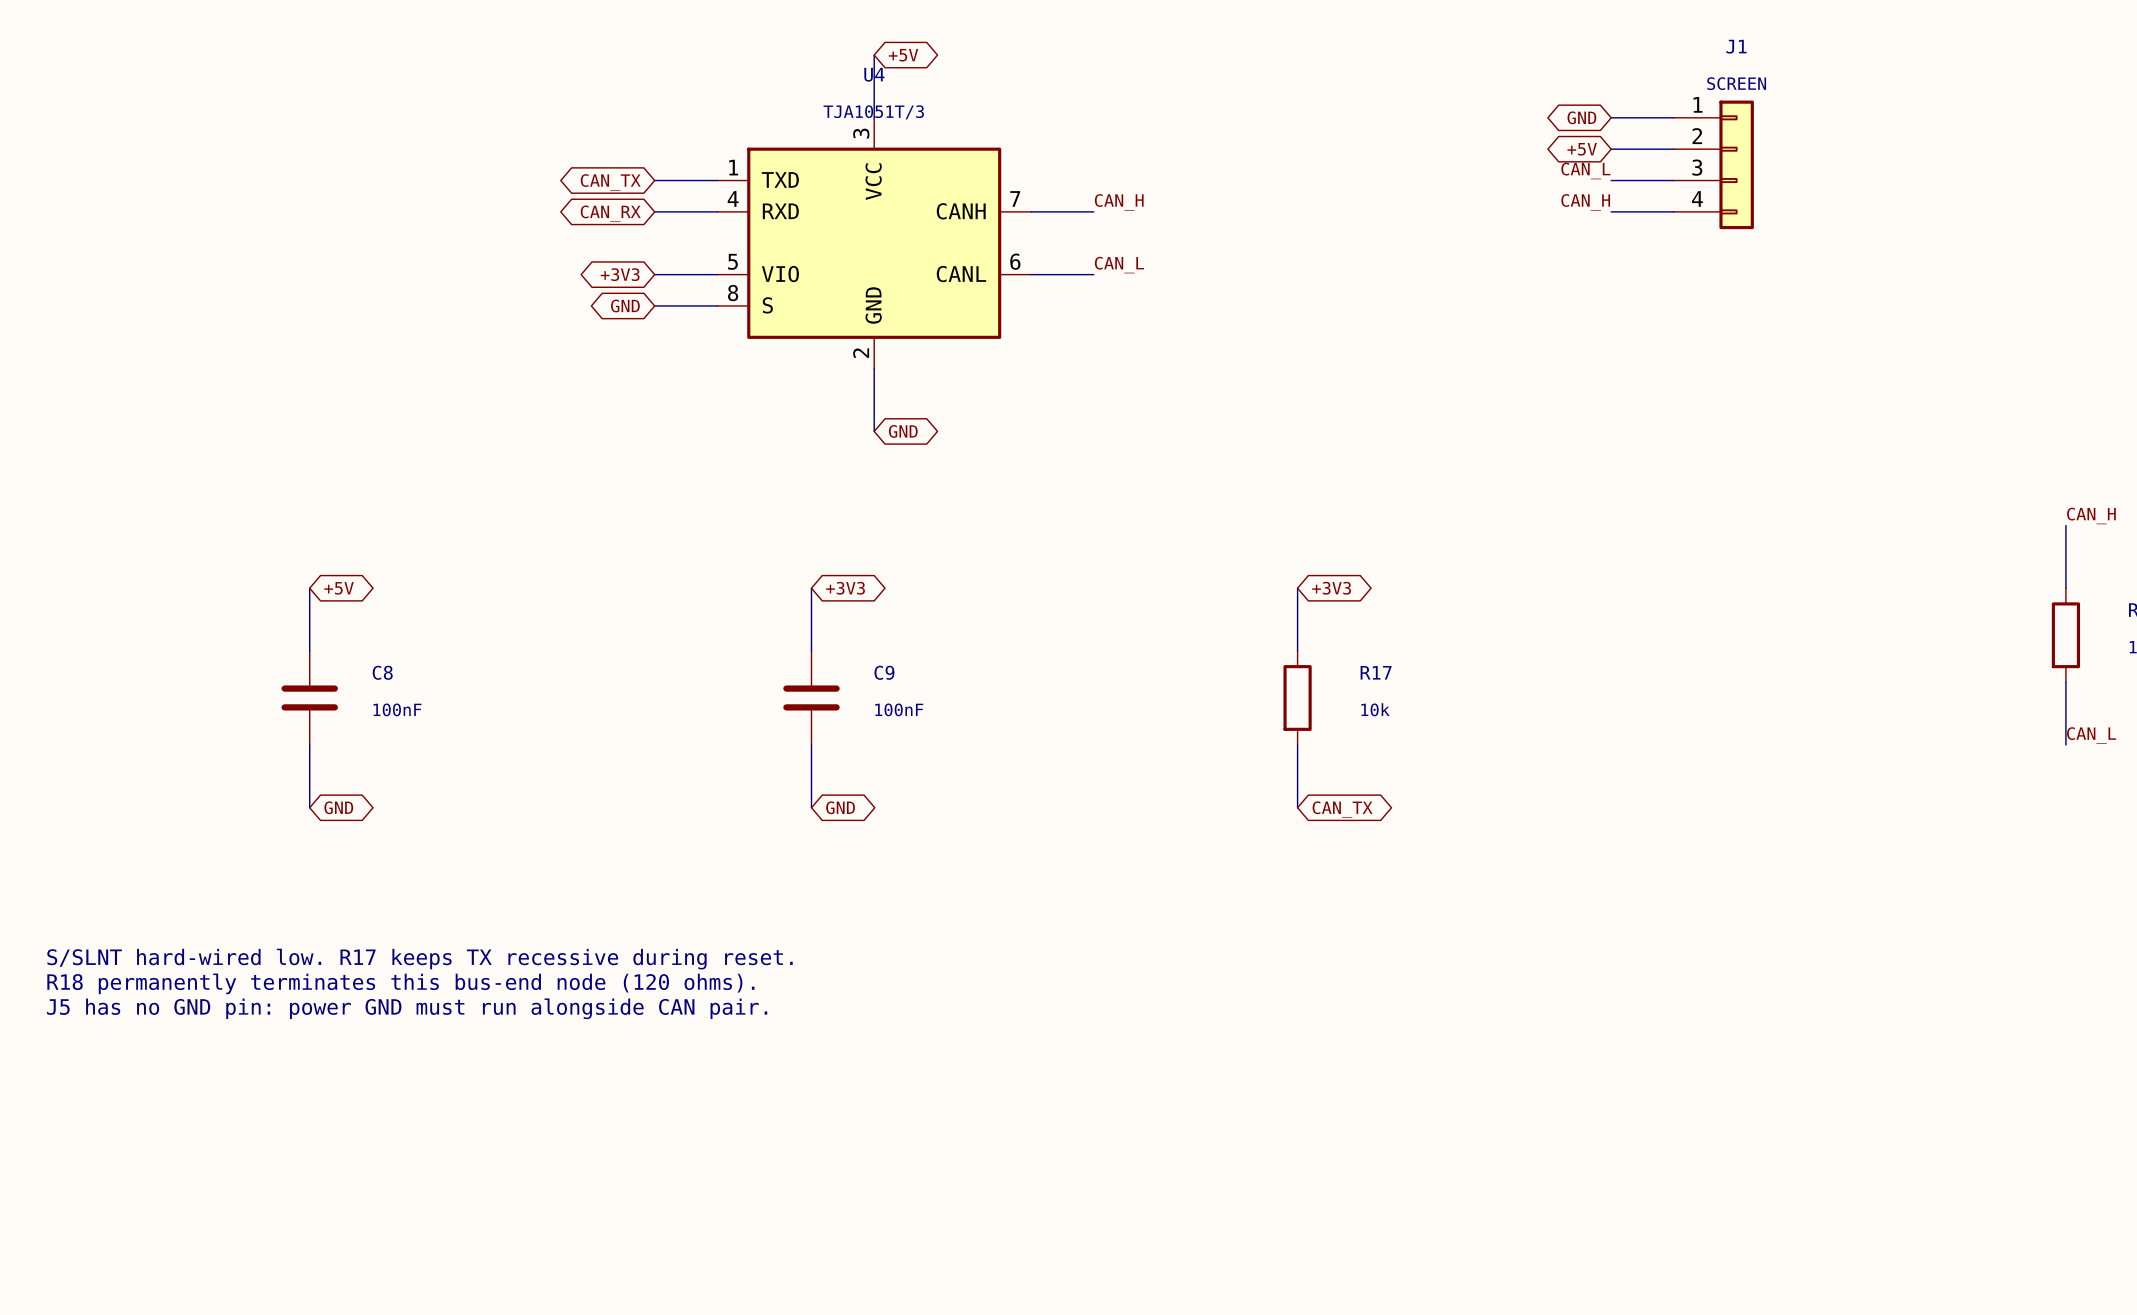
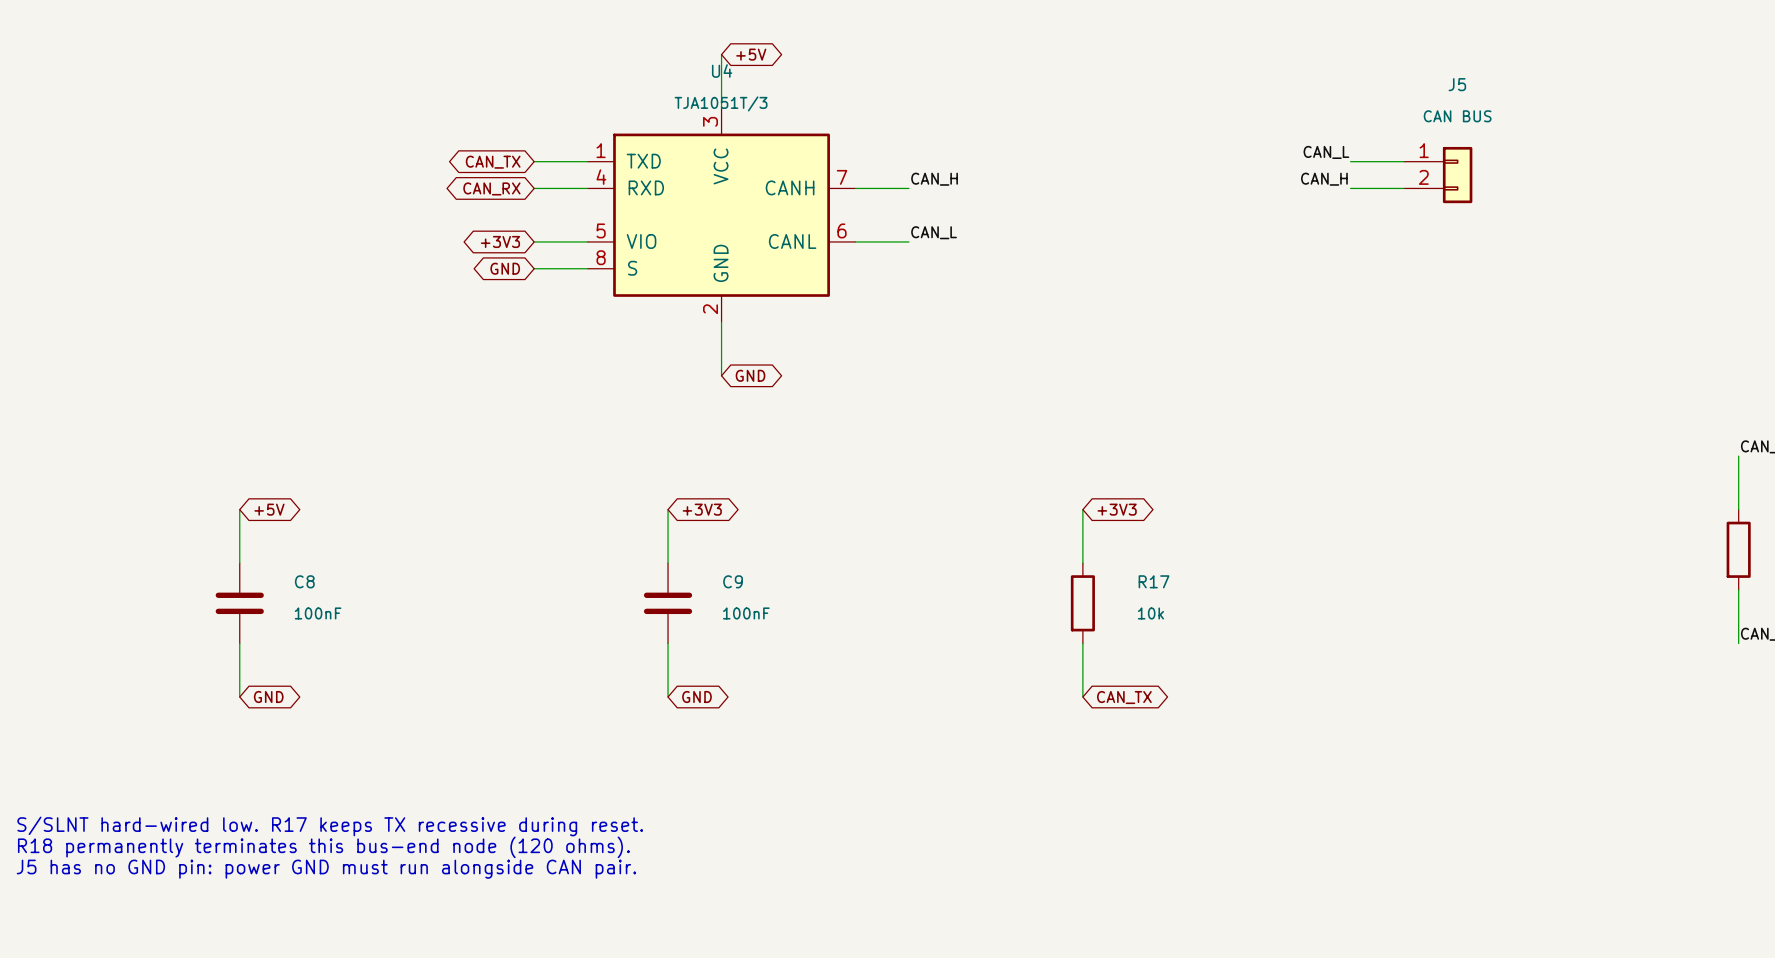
global label: GND (1581, 117) -> none
wire: (1611, 117) (1673, 117) -> none
global label: +5V (1582, 149) -> none
wire: (1611, 149) (1673, 149) -> none
J1: SCREEN (1713, 164) -> none
J5: none -> CAN BUS (1438, 175)

